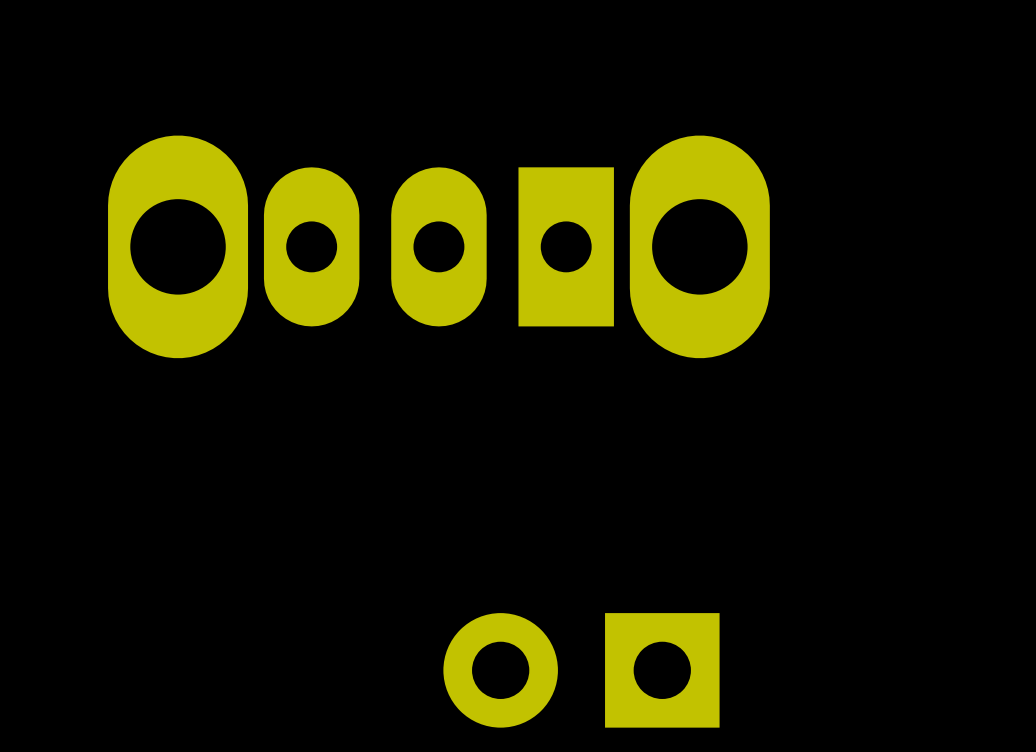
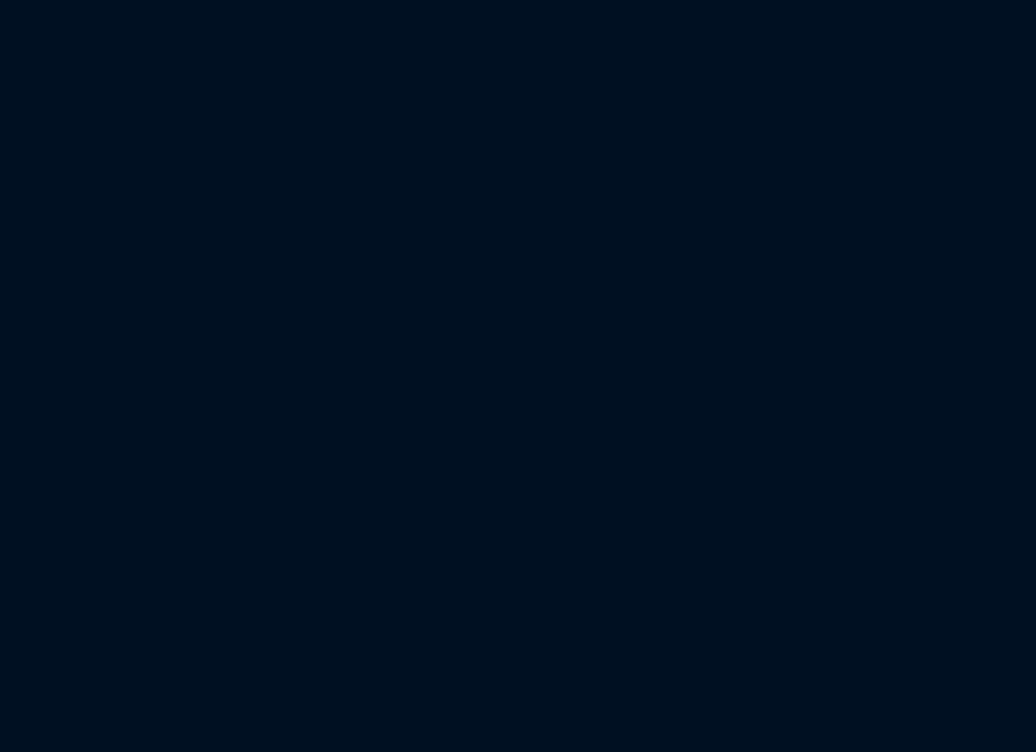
part: (438, 246) -> none
part: (581, 670) -> none

